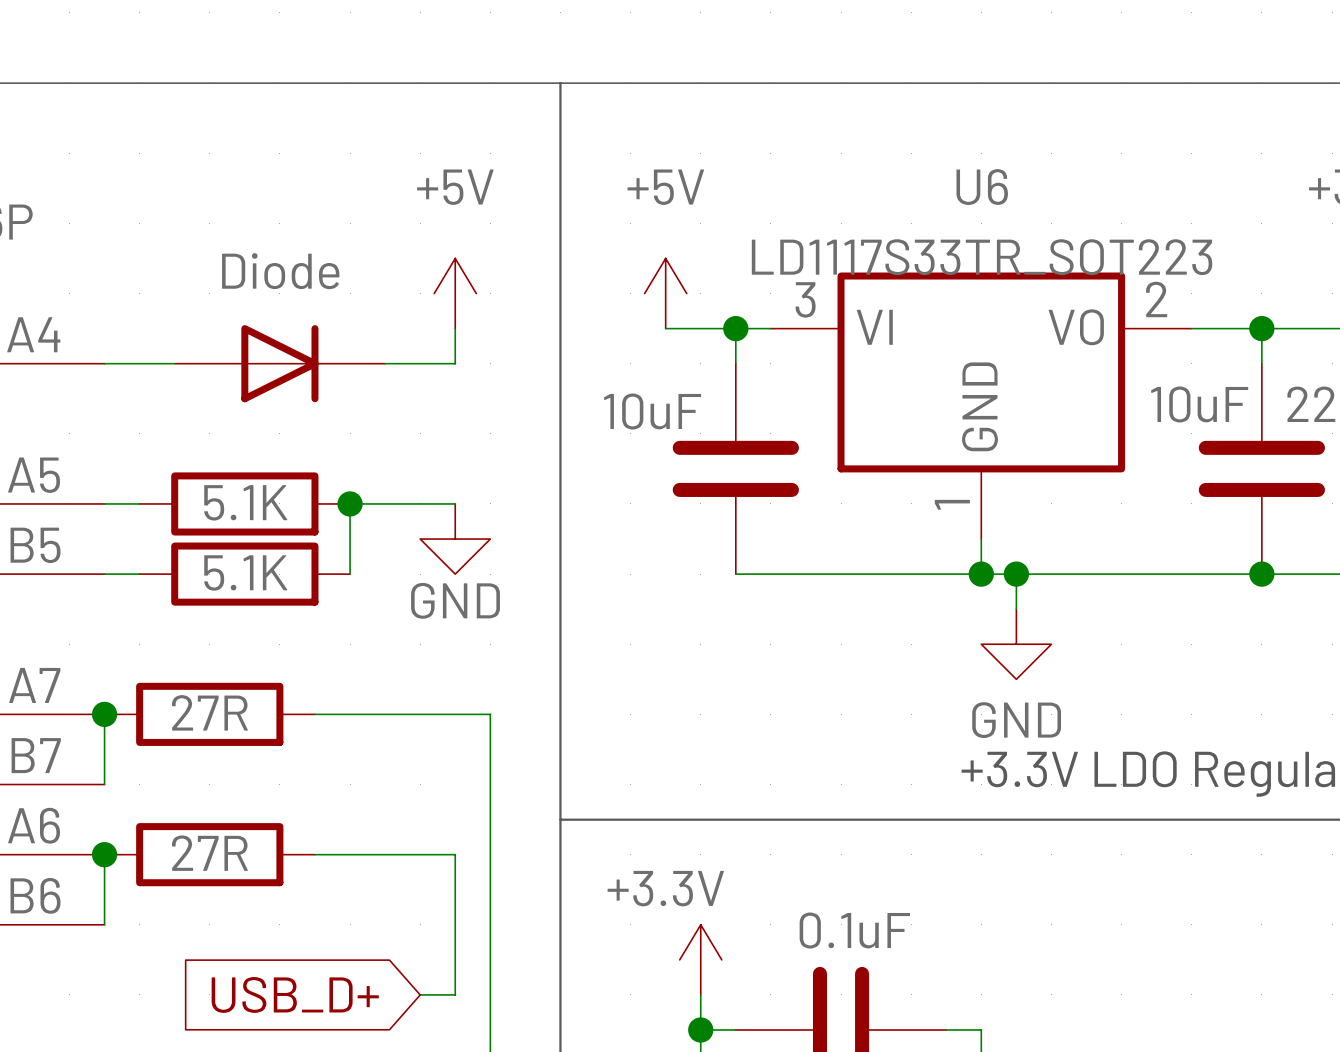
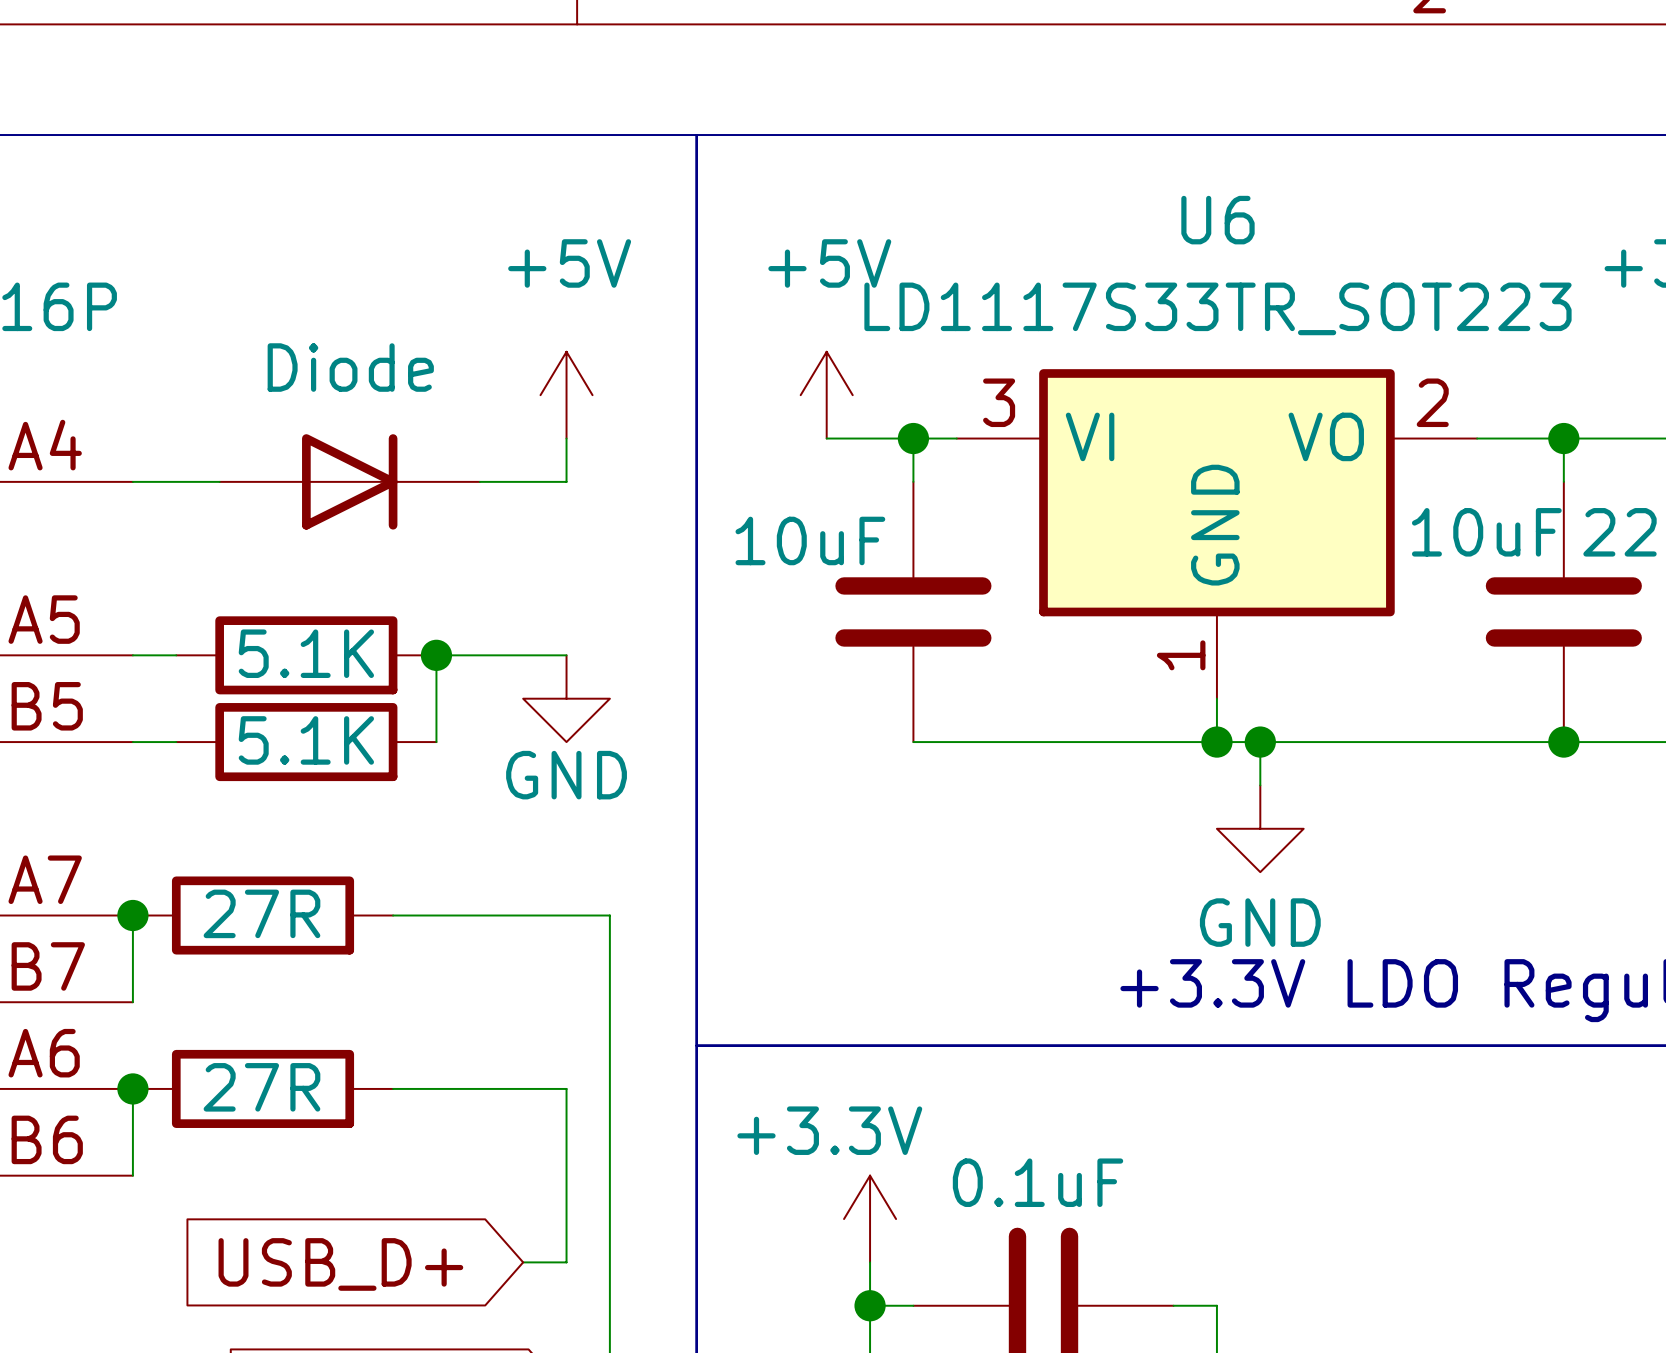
U6 name position: U6 (982, 187) -> U6 (1217, 220)
U6 value position: LD1117S33TR_SOT223 (982, 257) -> LD1117S33TR_SOT223 (1217, 308)

